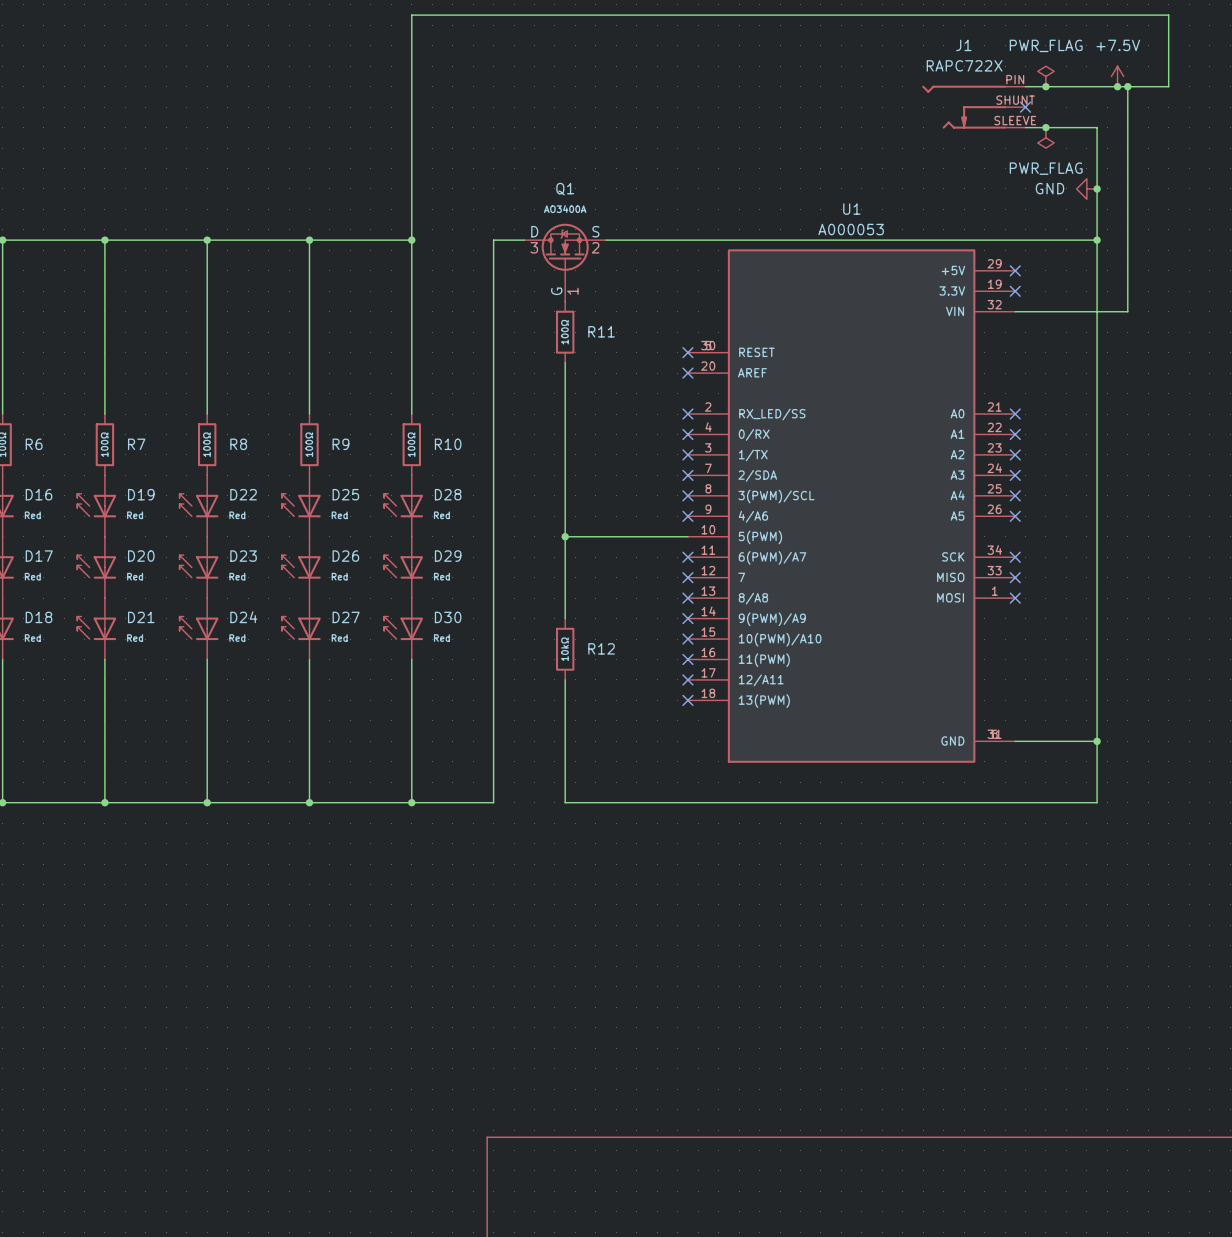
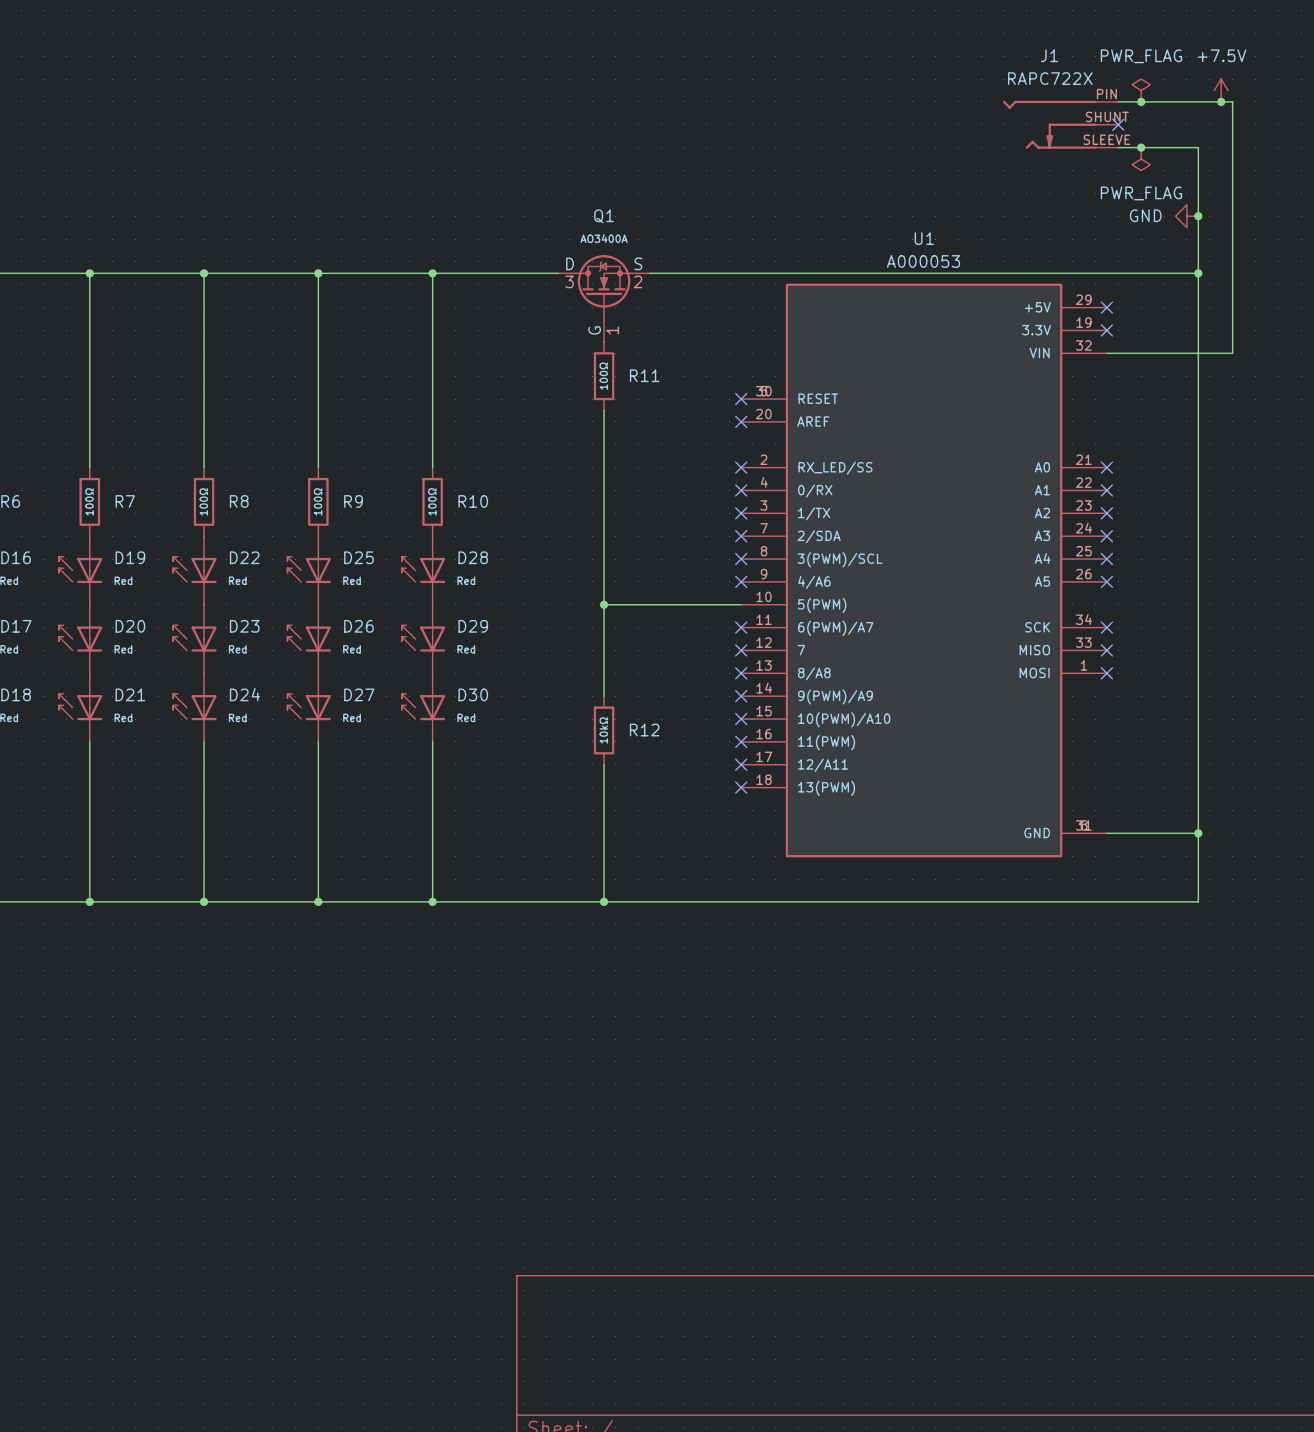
wire: (1127, 86) (1168, 86) (1168, 15) (411, 15) (411, 240) -> (524, 273) (432, 273)
junction: (1127, 86) -> none
wire: (493, 240) (493, 802) -> (604, 901) (524, 901)
junction: none -> (604, 901)

